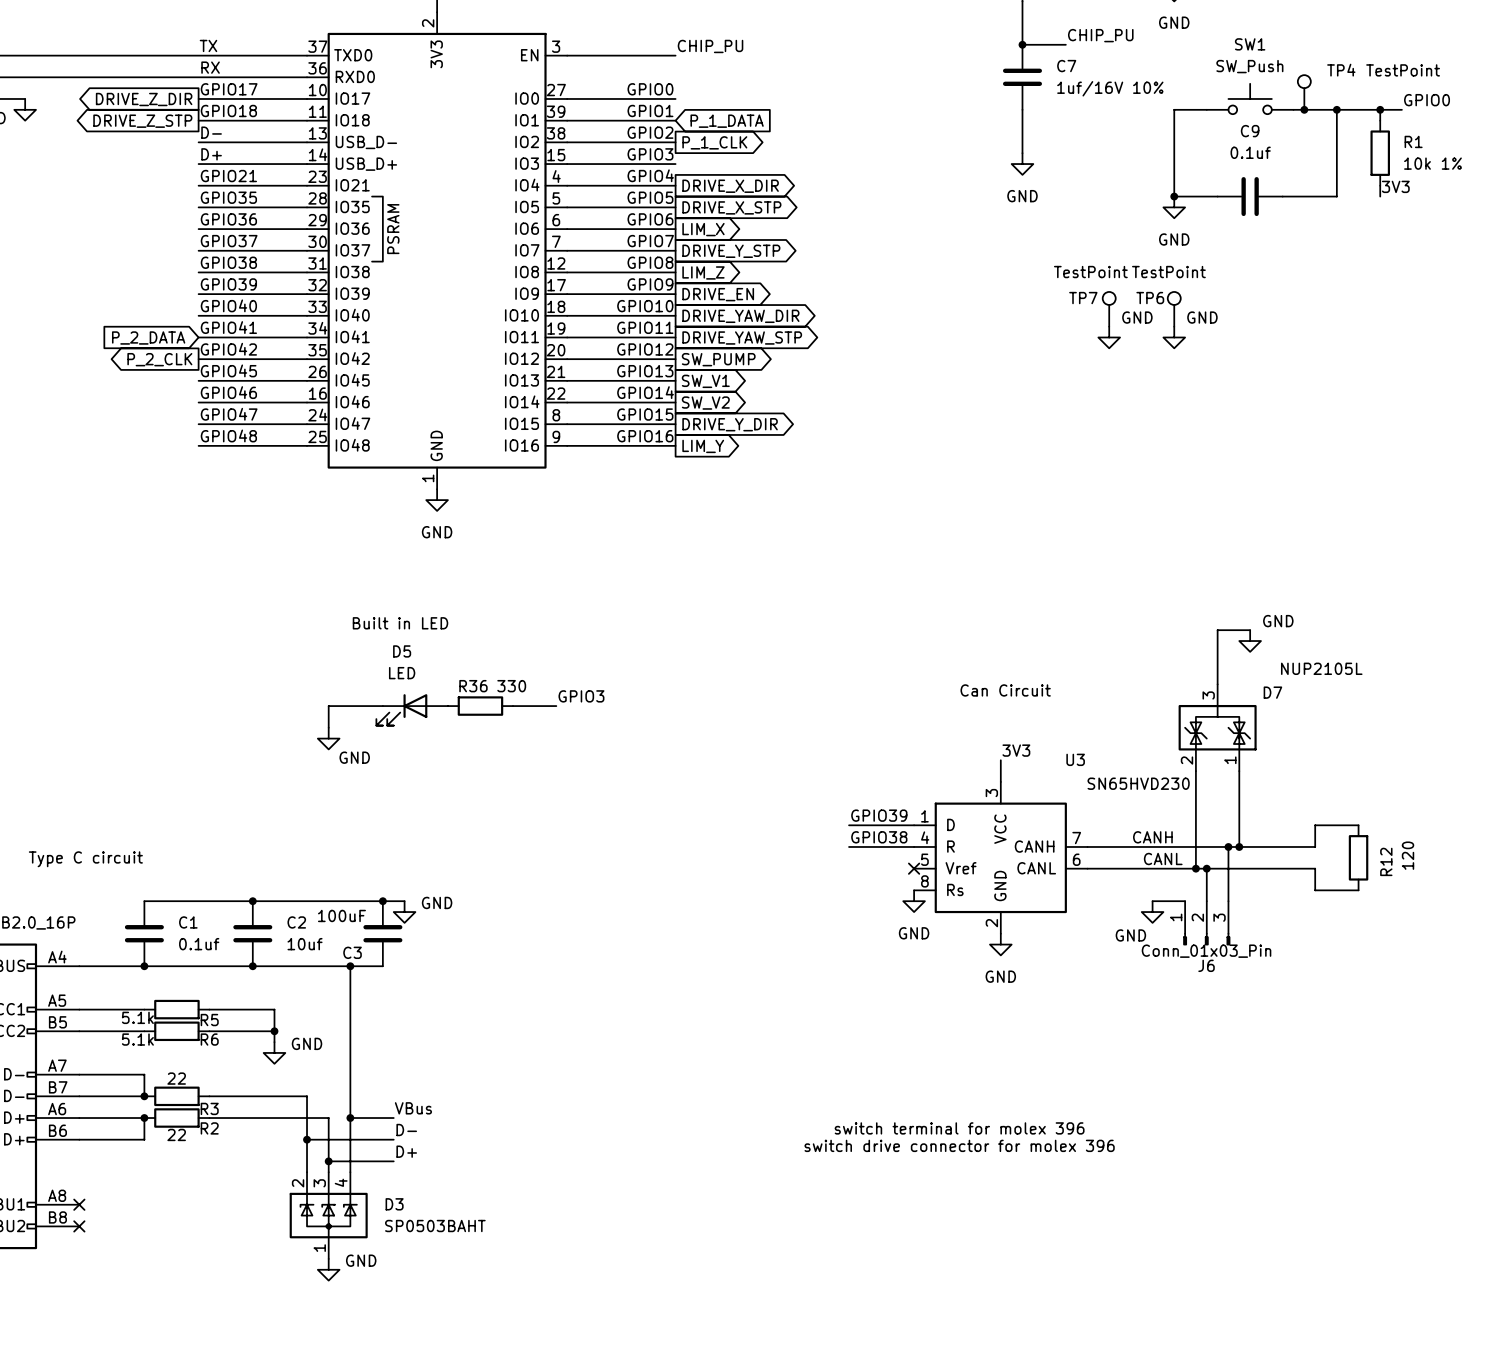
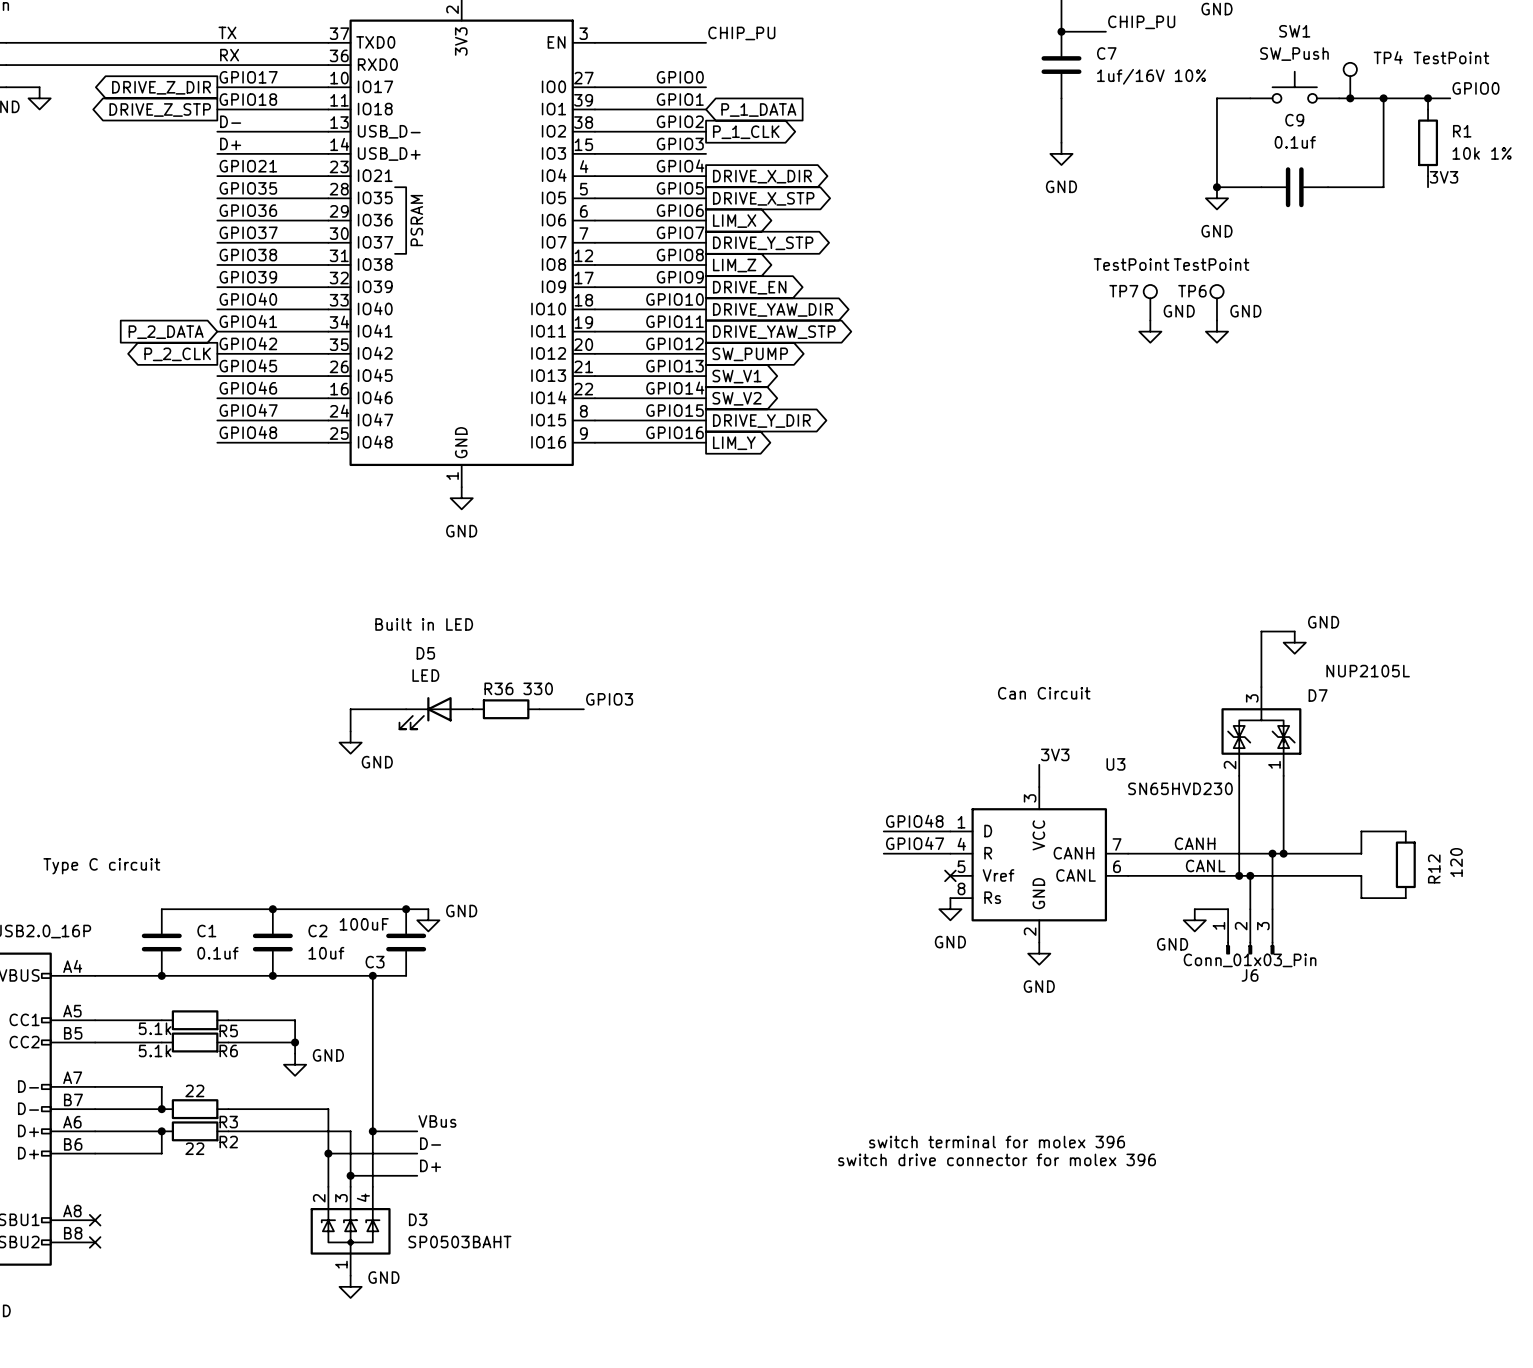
label: GPIO39 (879, 815) -> GPIO48 (914, 821)
label: GPIO38 (879, 837) -> GPIO47 (915, 843)

